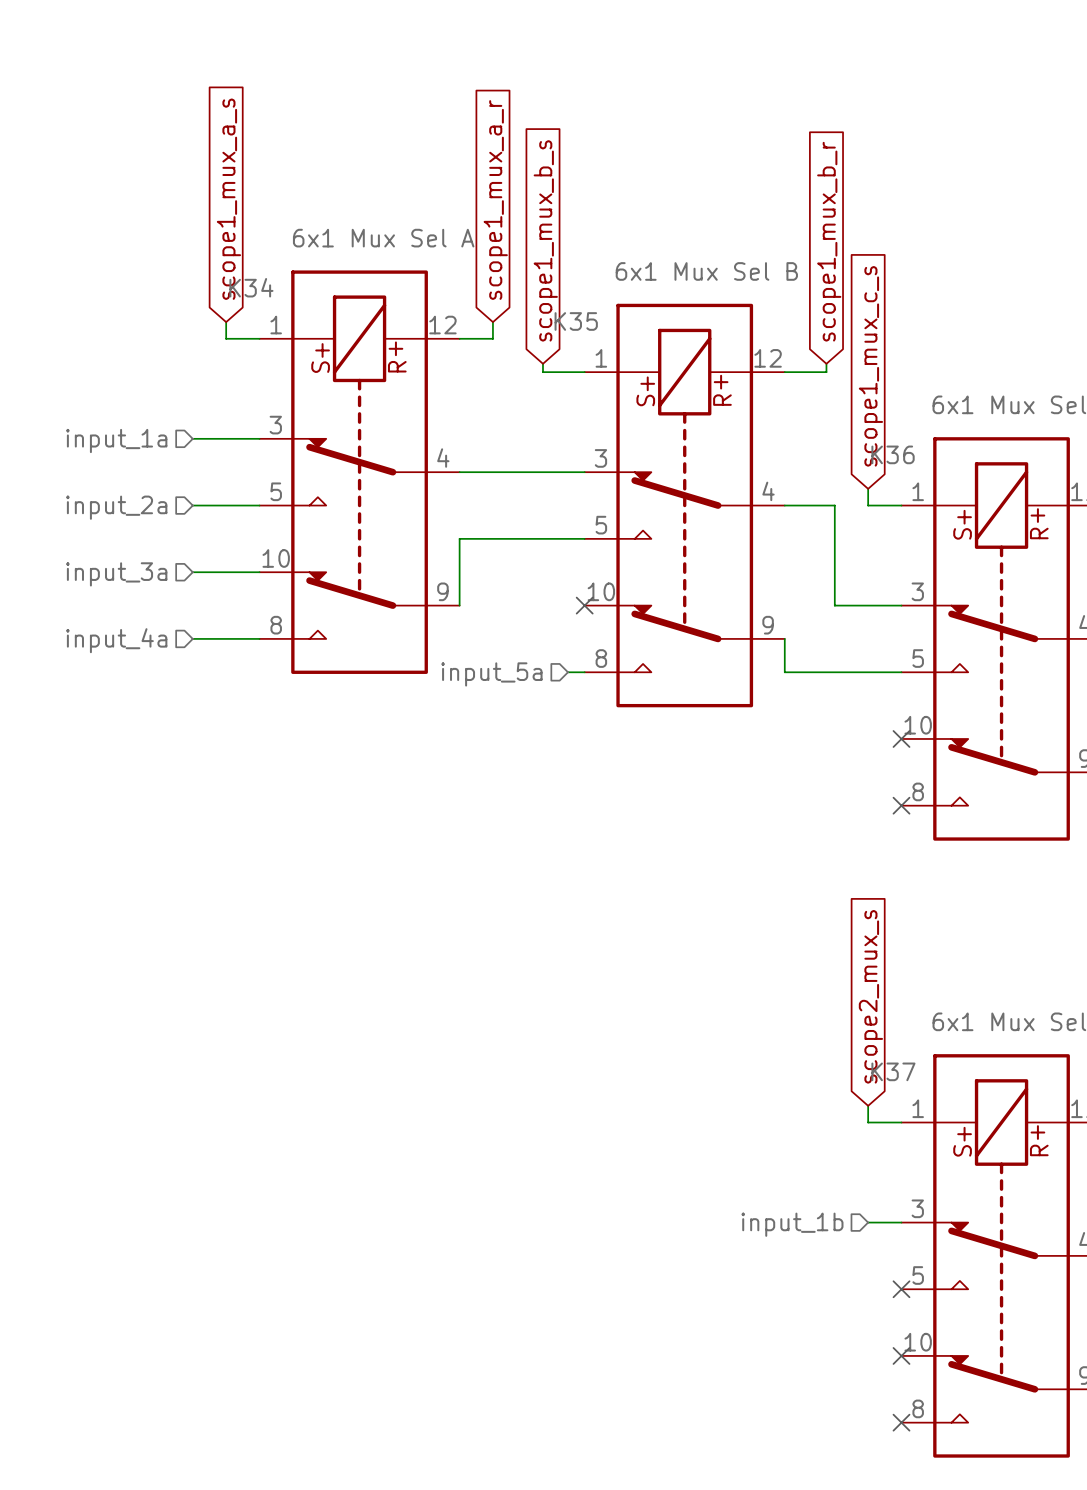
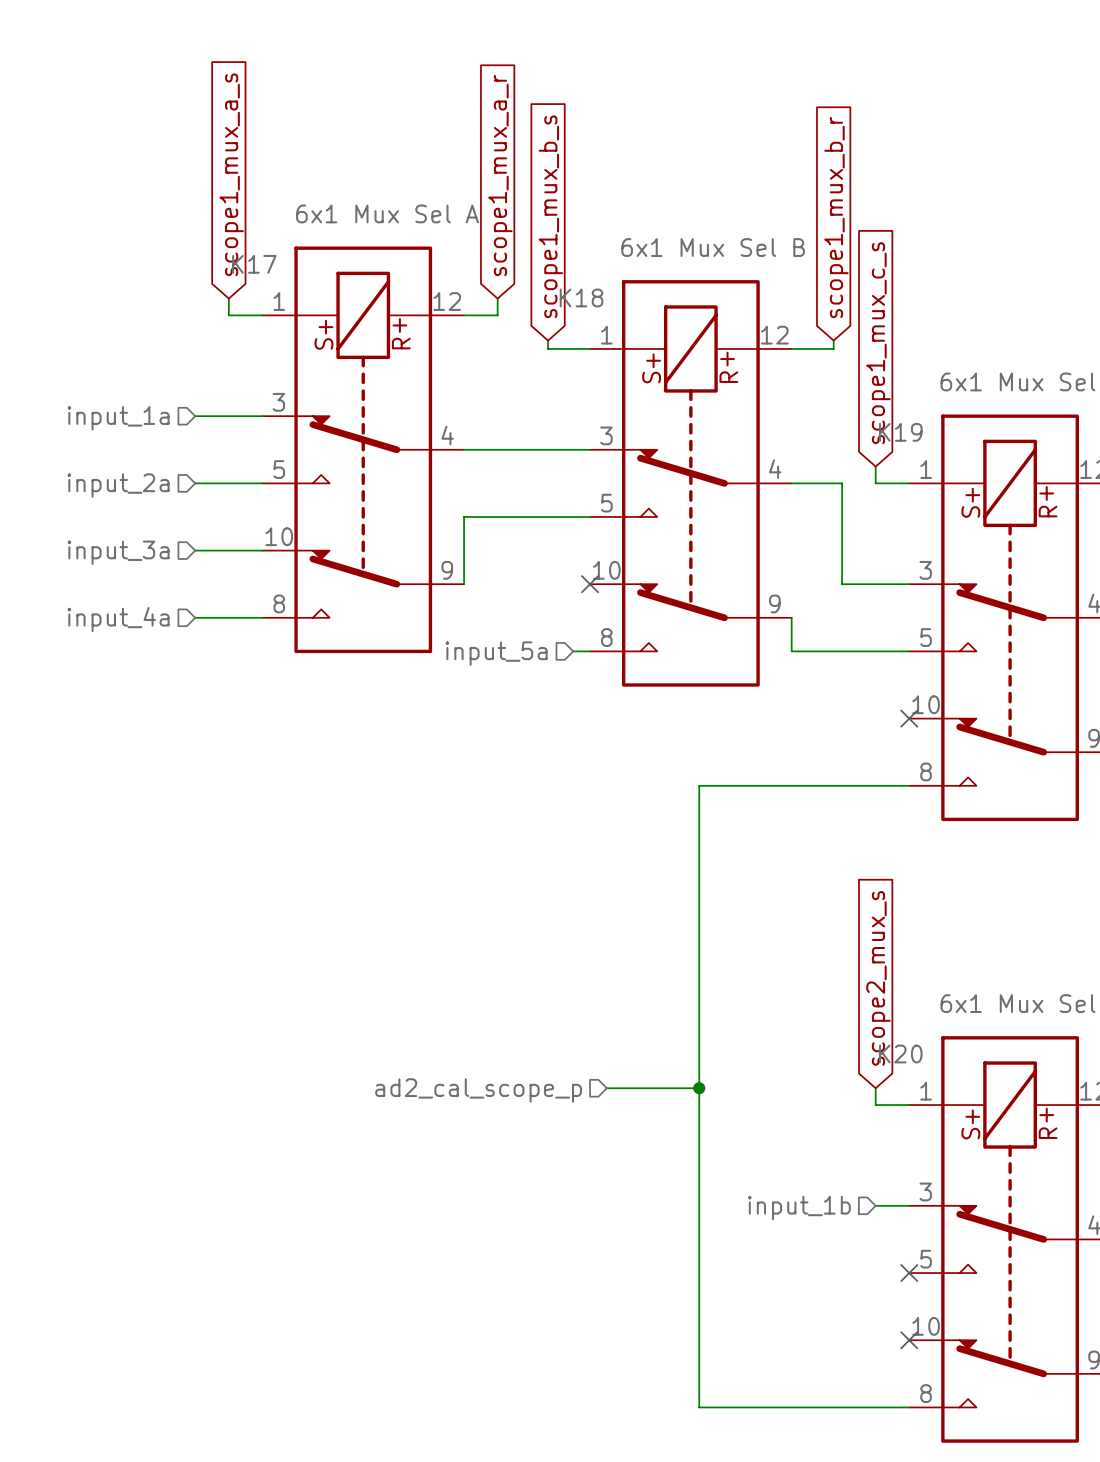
K34 name: K34 (251, 287) -> K17 (254, 264)
K35 name: K35 (576, 321) -> K18 (581, 297)
K36 name: K36 (893, 454) -> K19 (900, 432)
wire: none -> (909, 785) (699, 785) (699, 1407) (909, 1407)
no-connect mark: (901, 805) -> none
K37 name: K37 (893, 1071) -> K20 (900, 1054)
wire: none -> (606, 1088) (699, 1088)
junction: none -> (699, 1088)
hierarchical label: none -> ad2_cal_scope_p (478, 1090)
no-connect mark: (901, 1422) -> none

